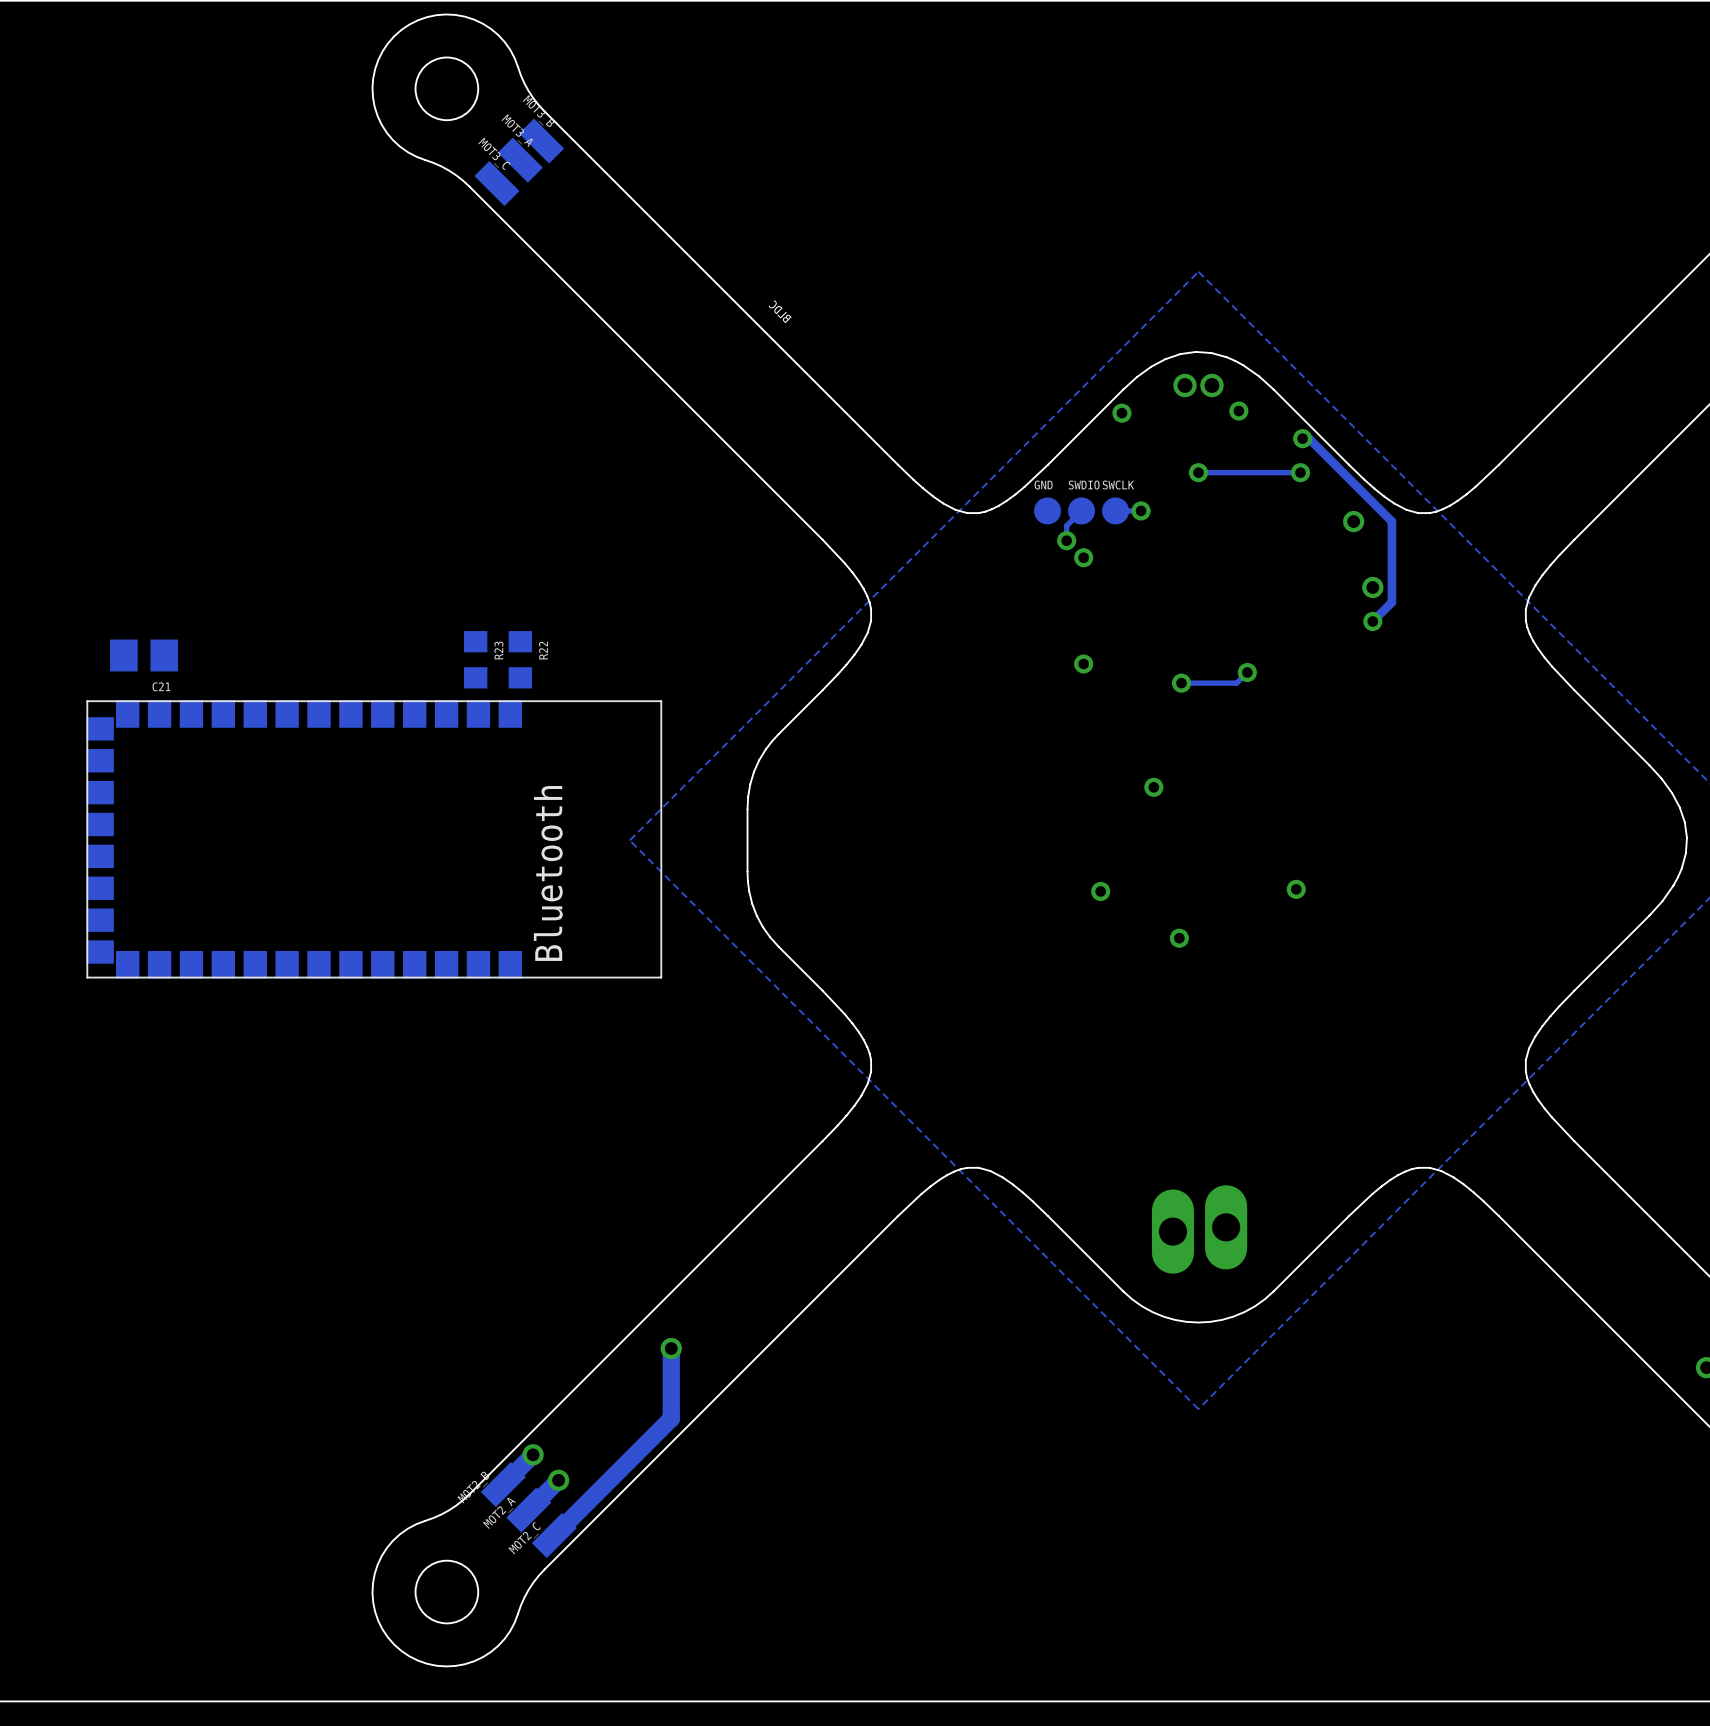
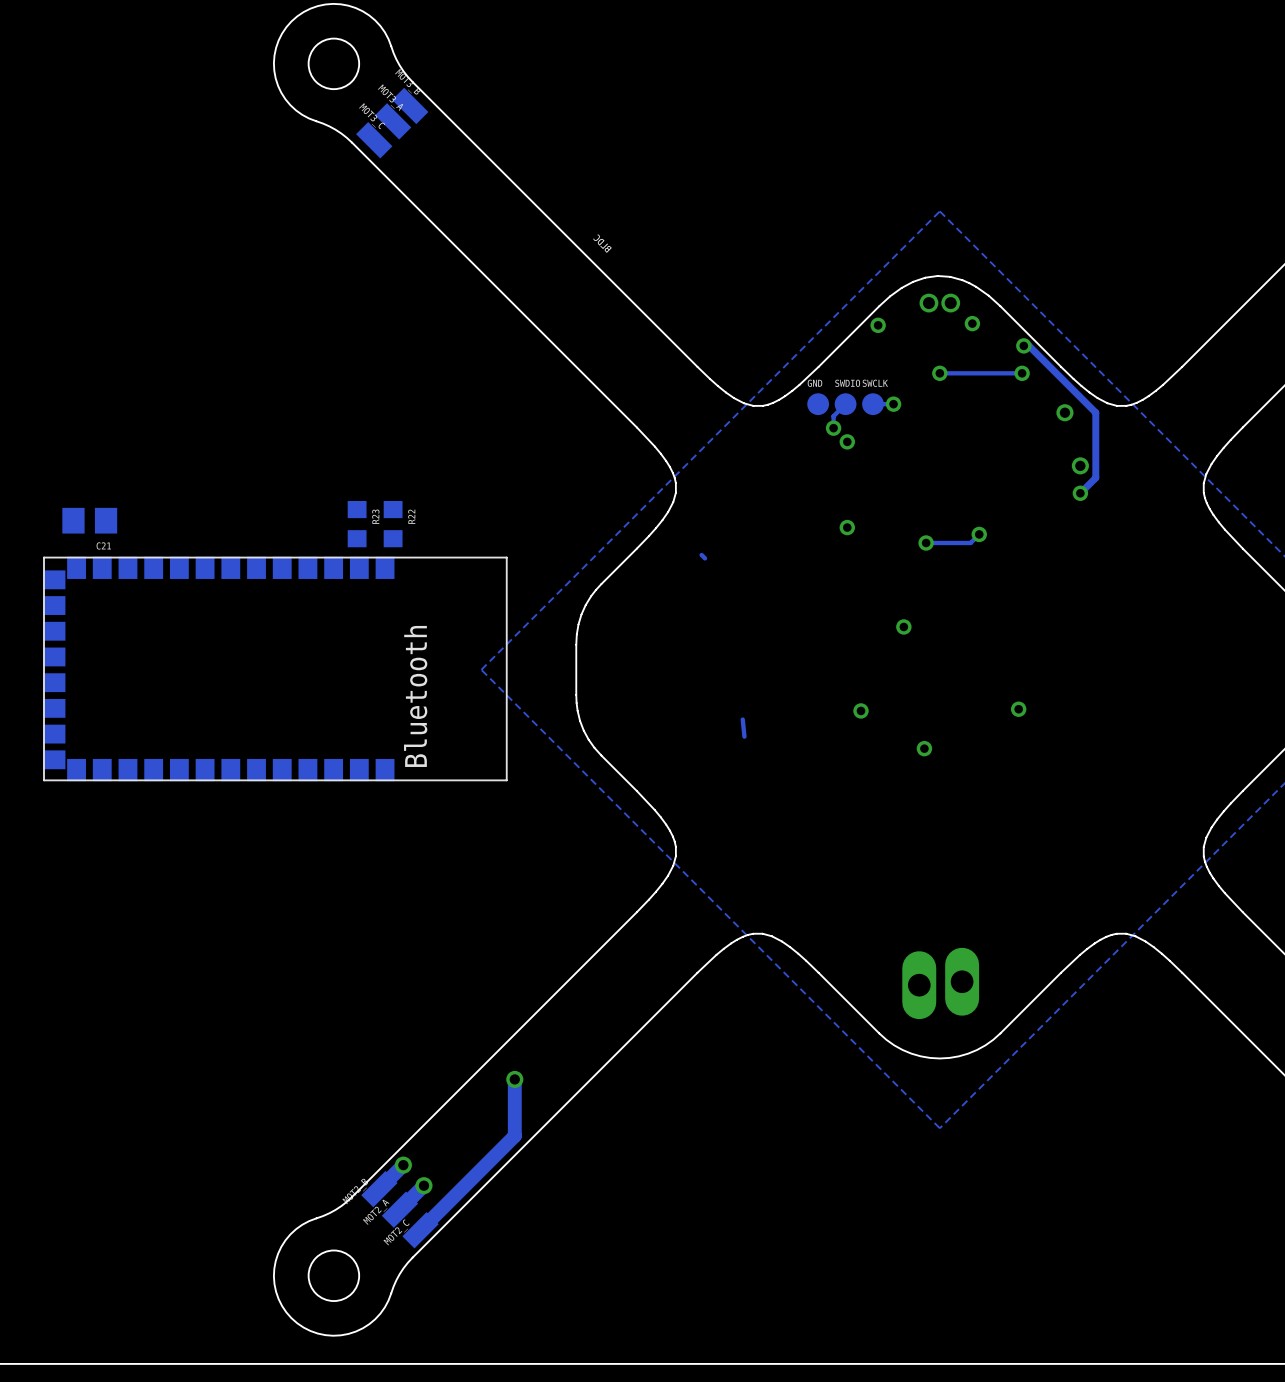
track: none -> (701, 554) (705, 558)
track: none -> (742, 719) (744, 736)

